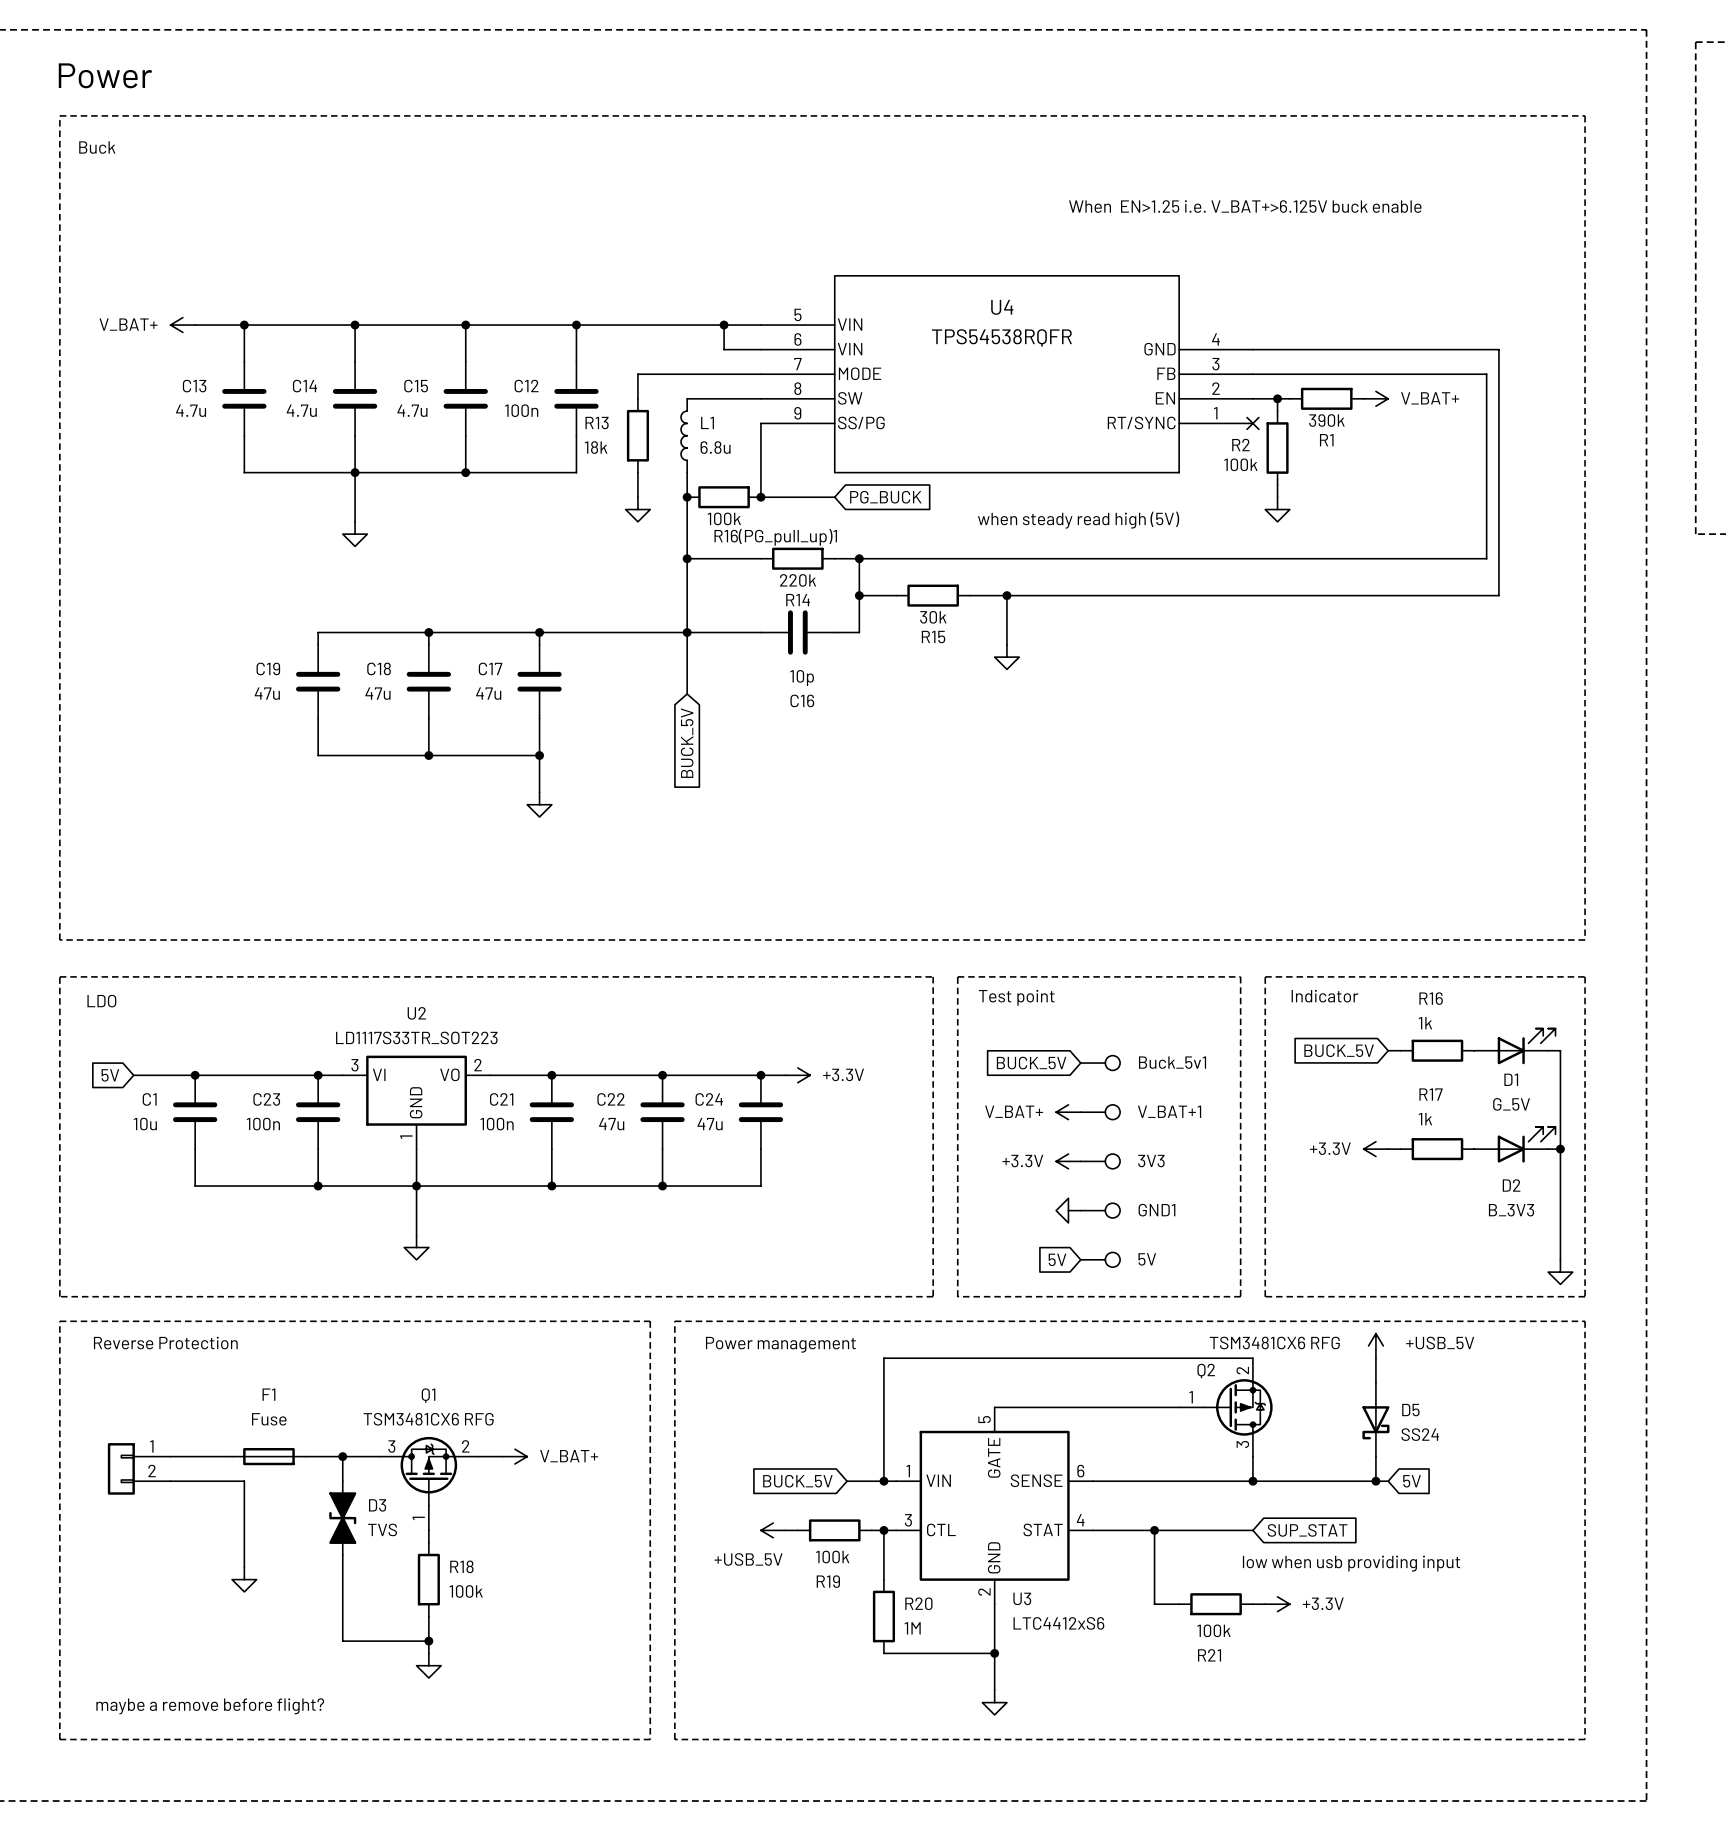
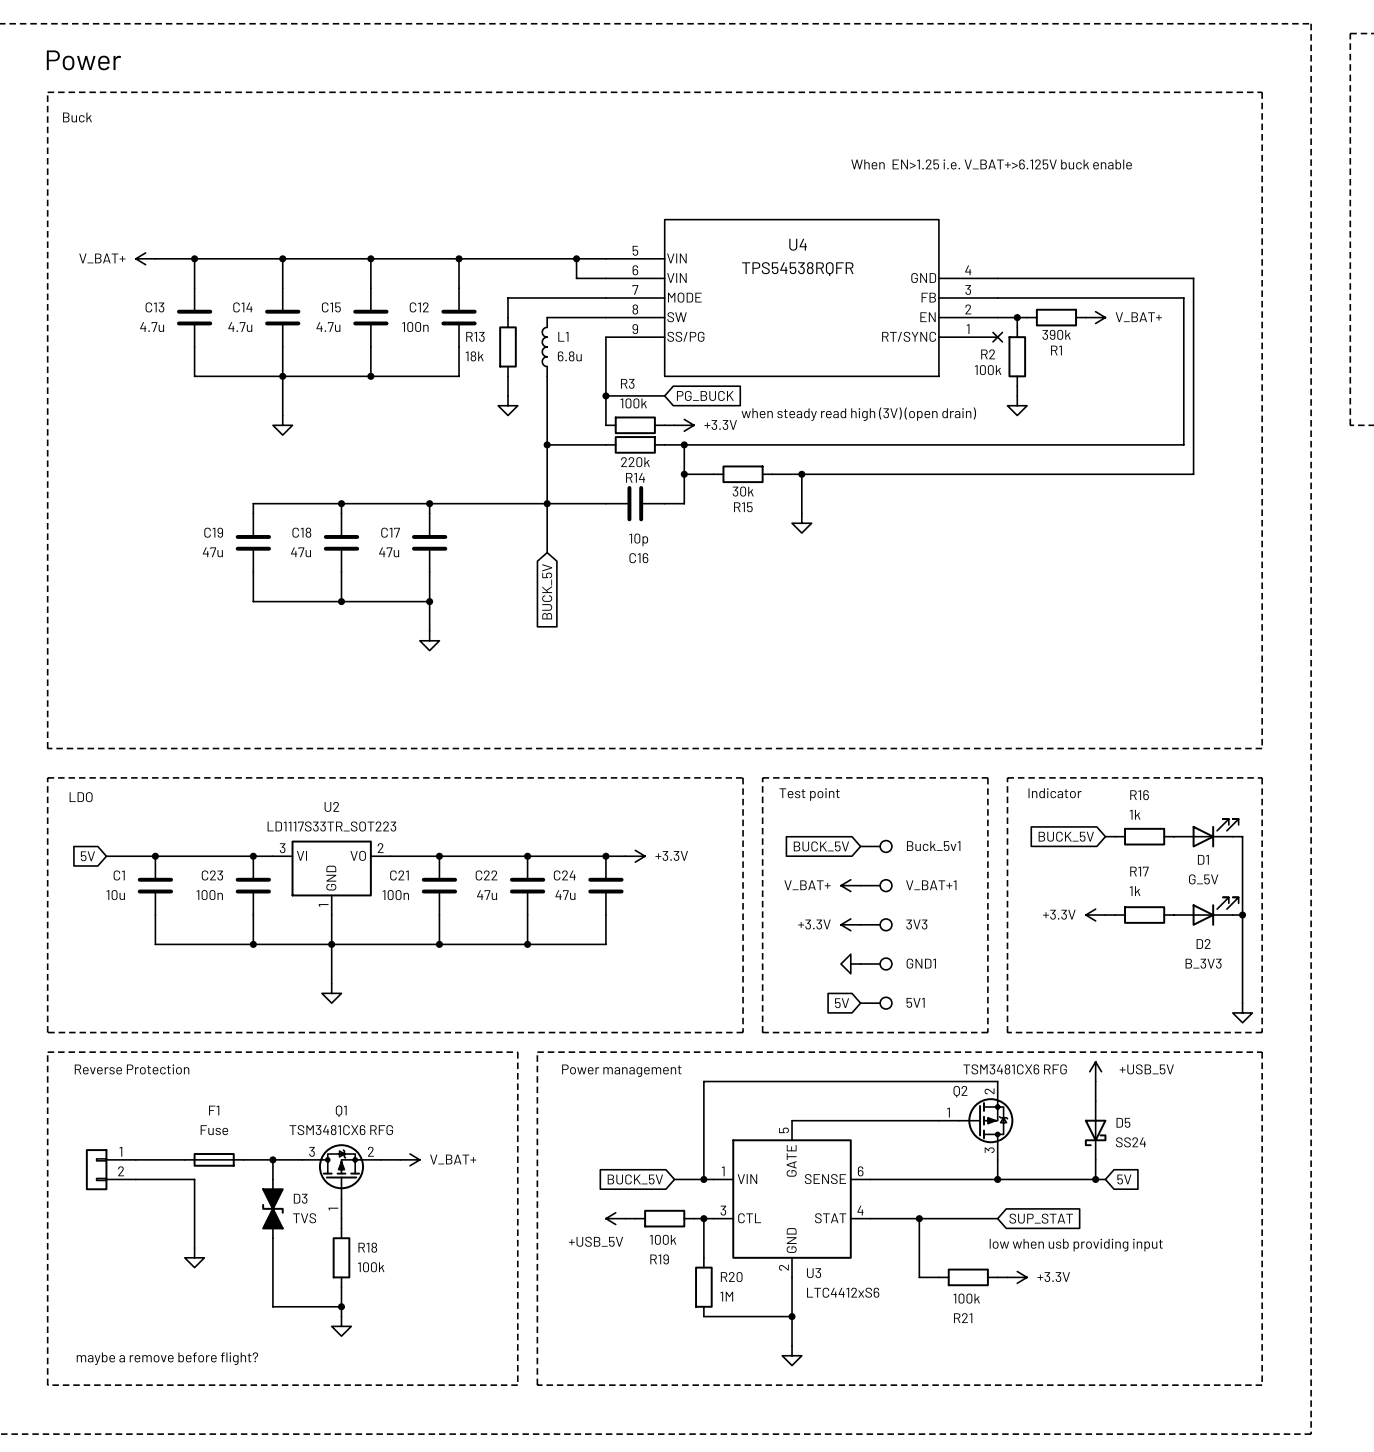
junction: (687, 497) -> none
R16(PG_pull_up)1: 100k (724, 497) -> none
wire: none -> (605, 395) (605, 425)
text: when steady read high (5V) (1078, 520) -> when steady read high (3V) (open drain) (858, 414)
R3: none -> 100k (635, 425)
wire: none -> (664, 425) (674, 425)
power symbol: none -> +3.3V (684, 425)
5V name: 5V (1147, 1259) -> 5V1 (915, 1002)

